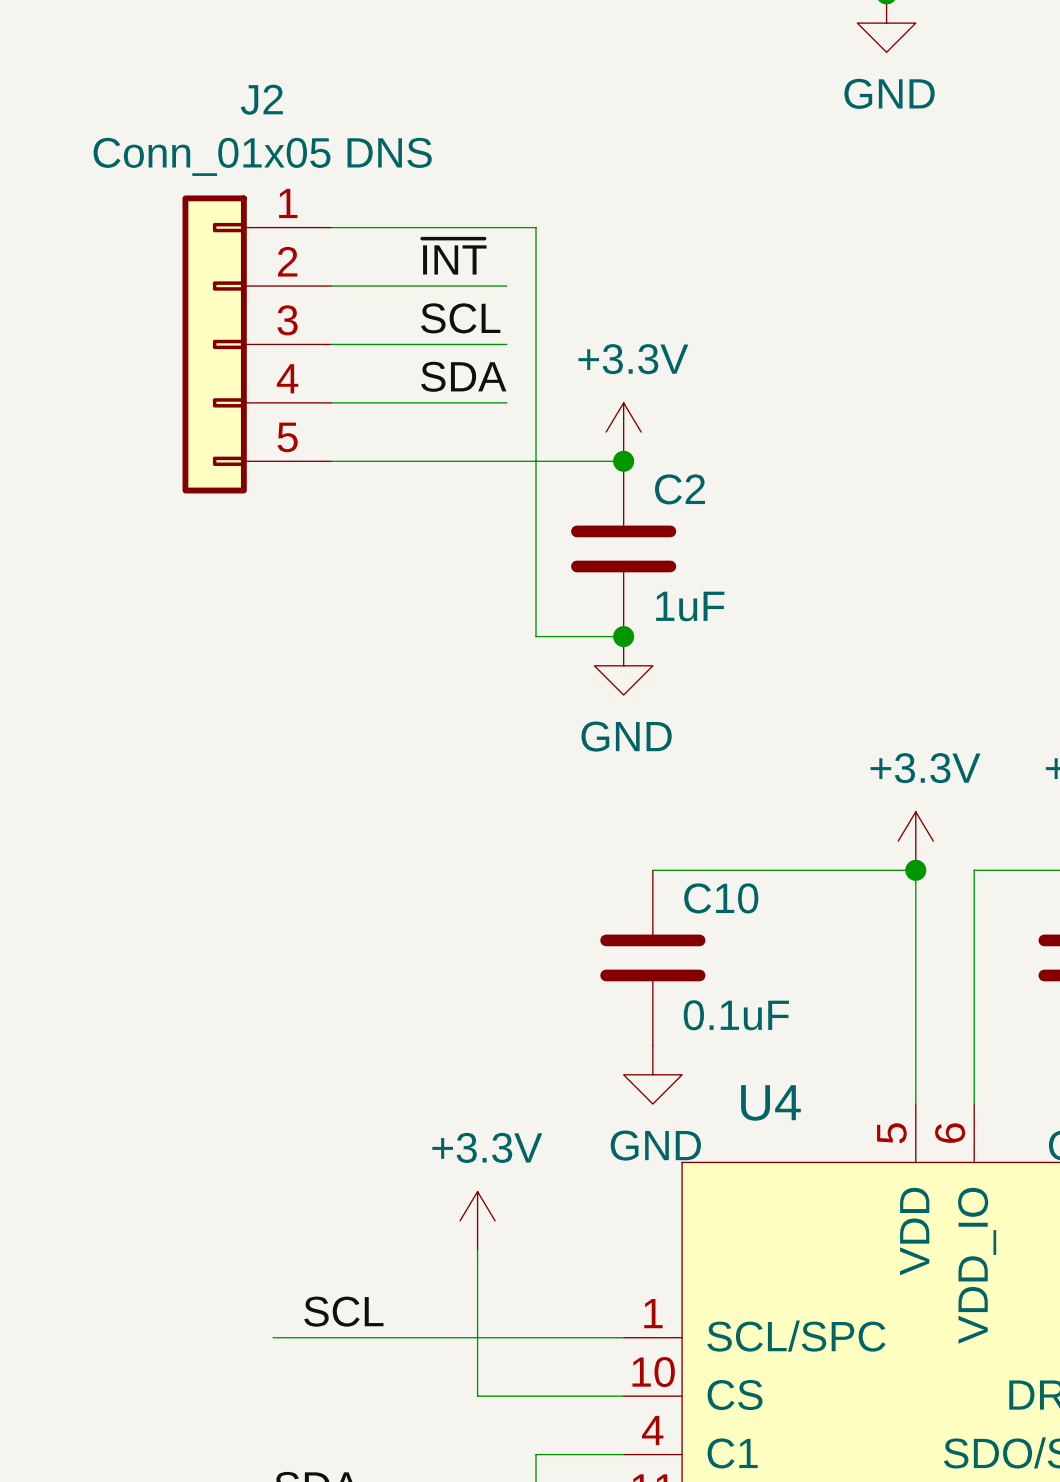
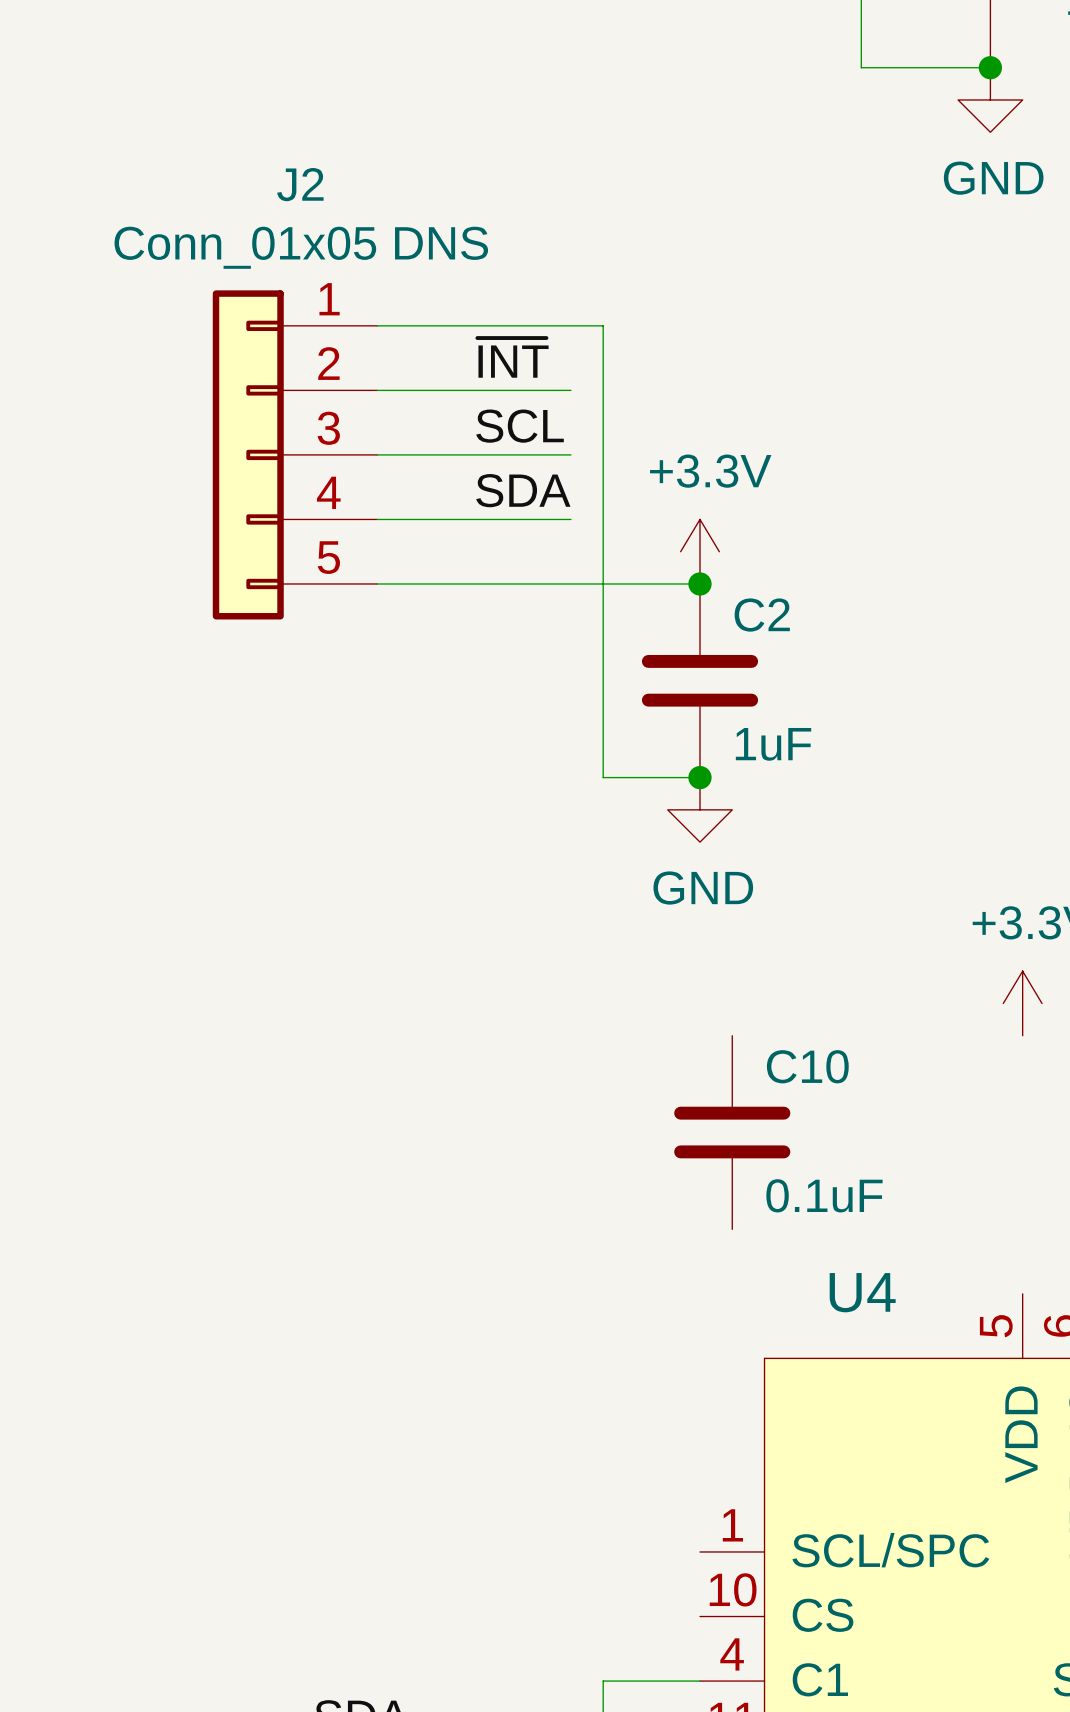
wire: (652, 870) (915, 870) (915, 1104) -> none
junction: (915, 870) -> none
power symbol: GND (652, 1074) -> none
power symbol: +3.3V (477, 1220) -> none
wire: (477, 1250) (477, 1396) (623, 1396) -> none
label: SCL (343, 1311) -> none
wire: (273, 1337) (623, 1337) -> none

